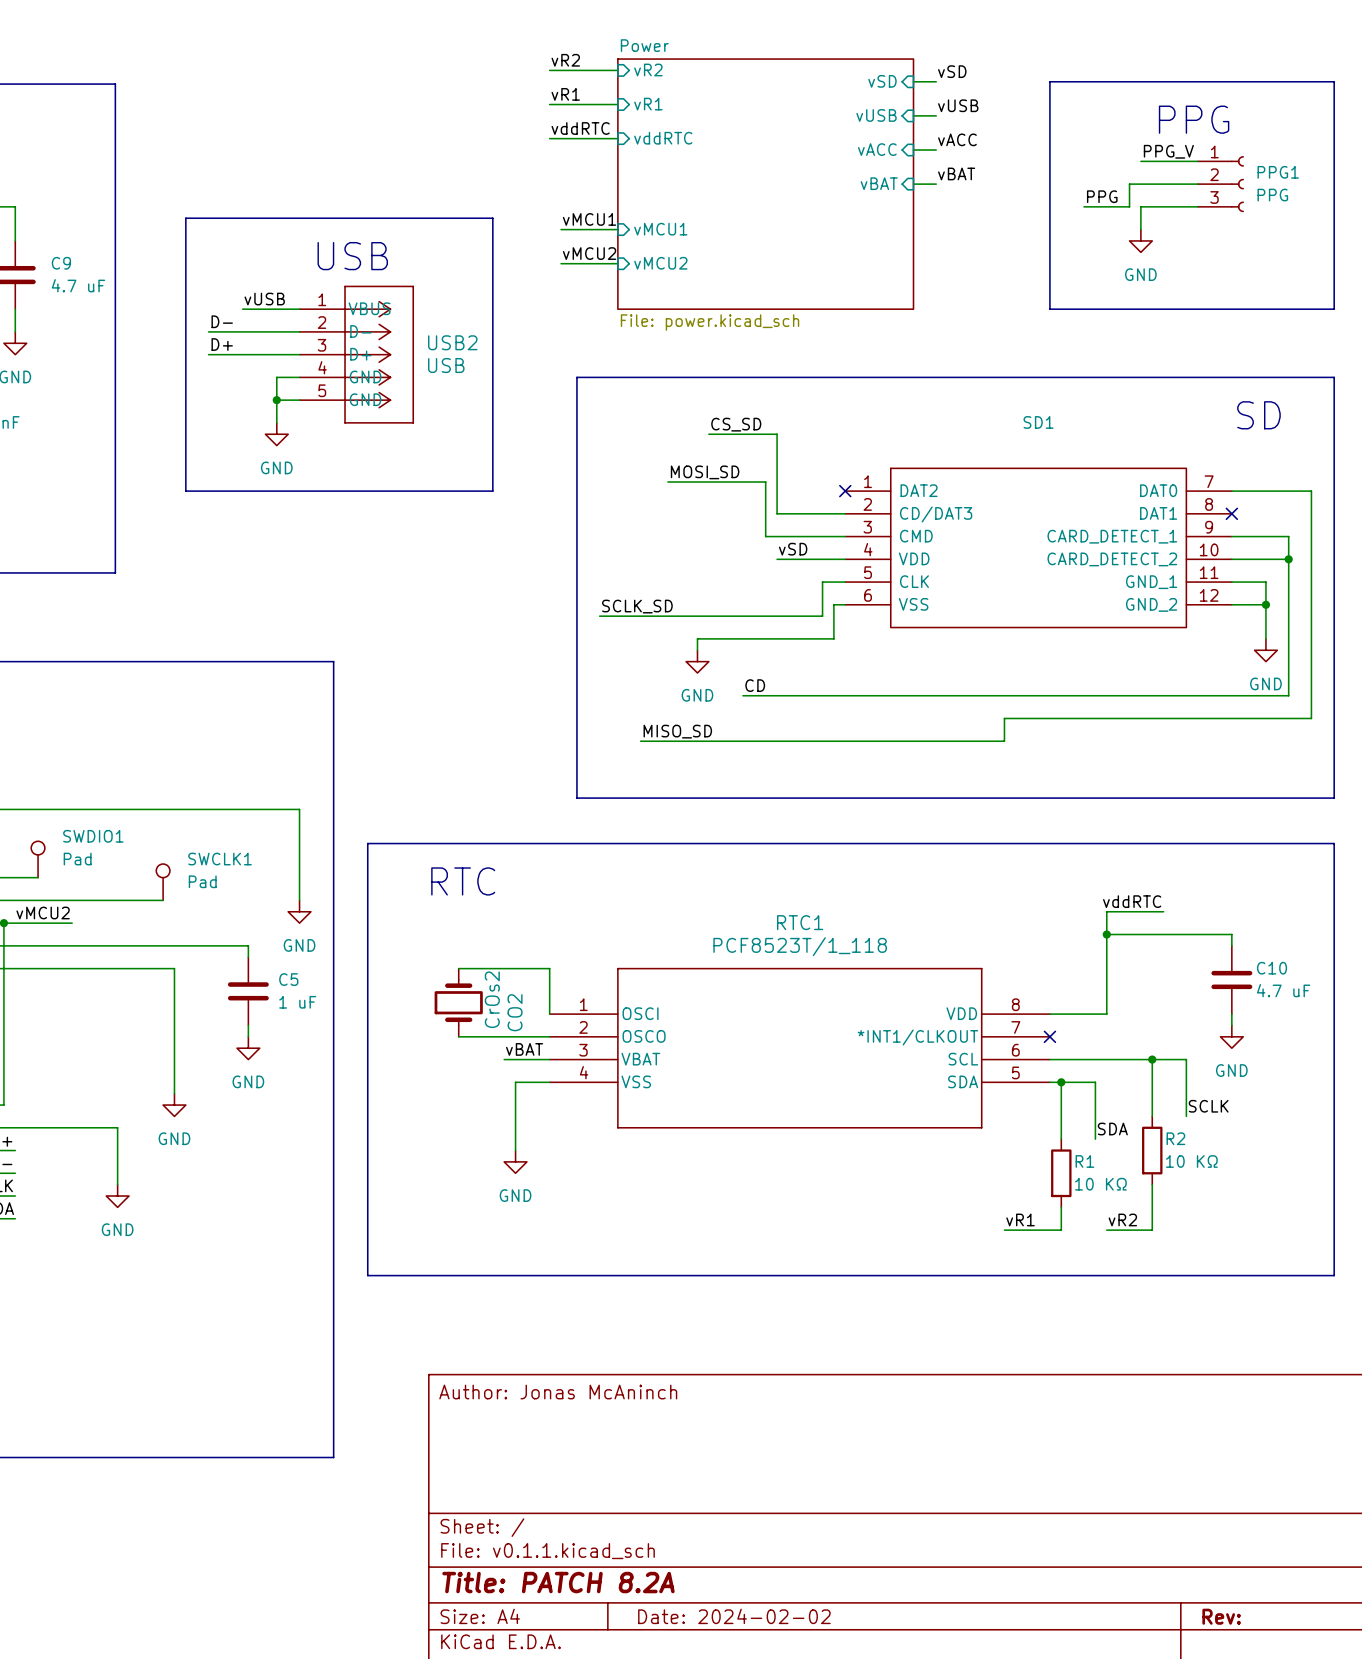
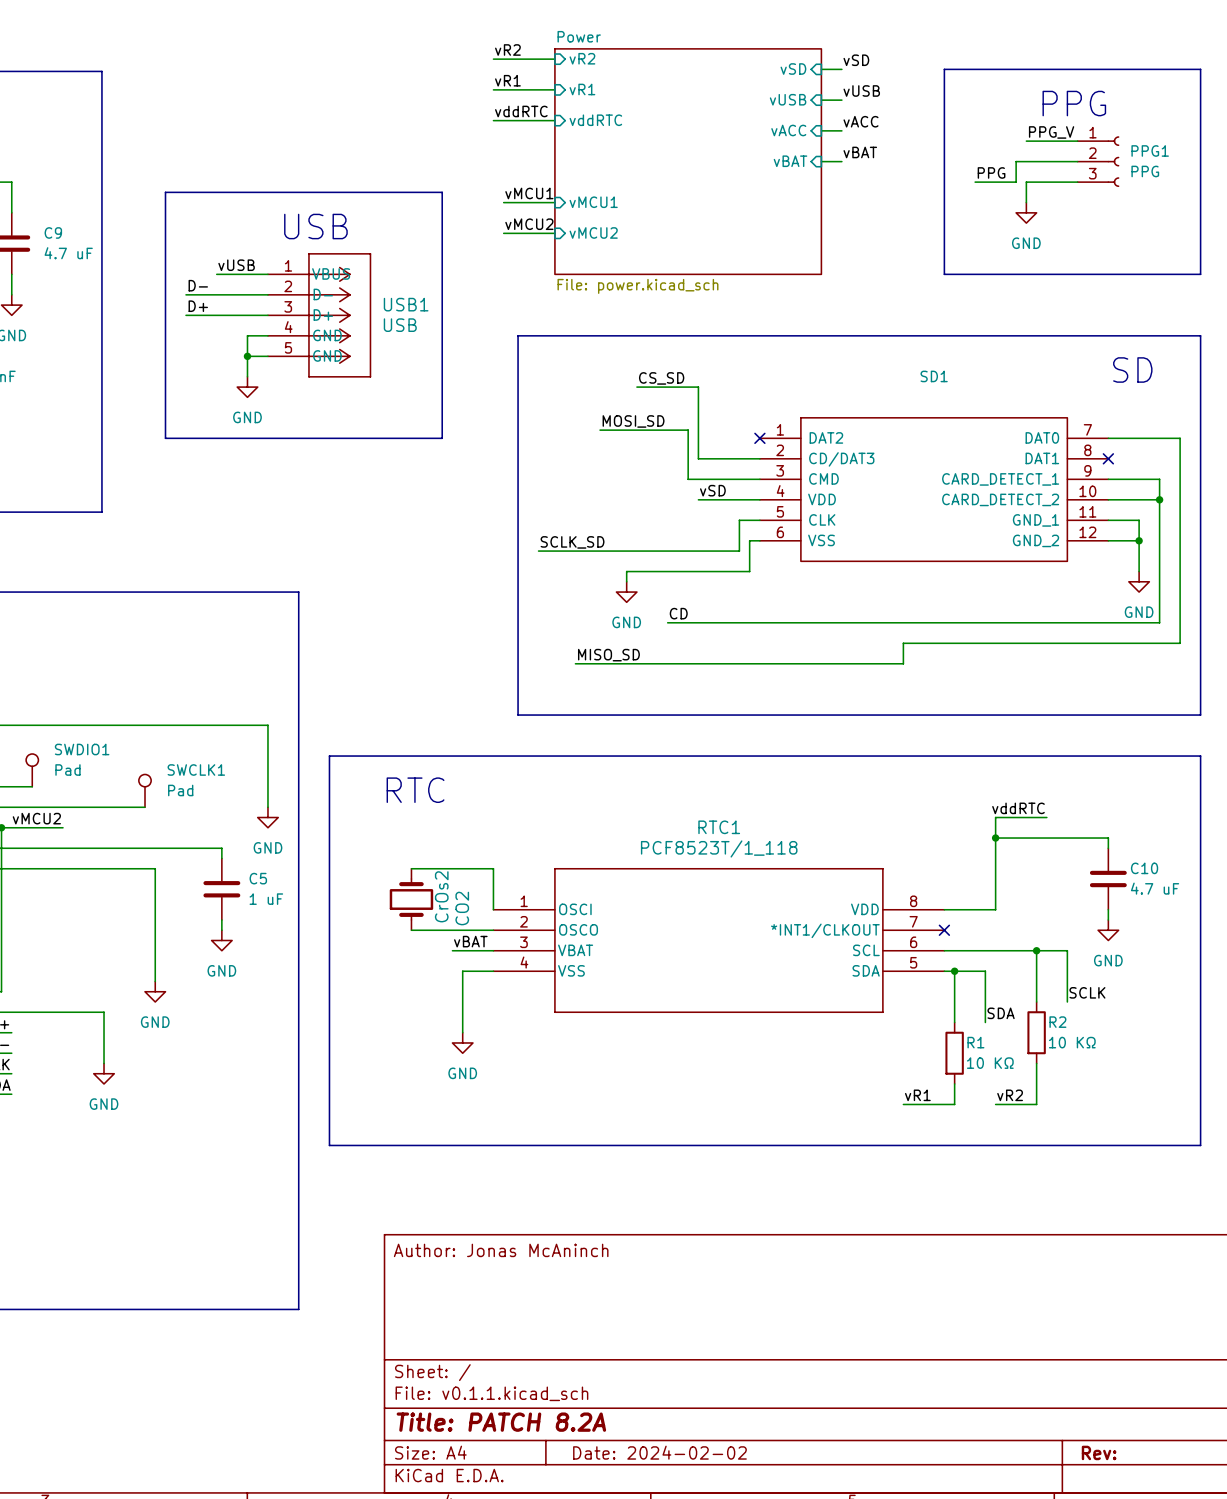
USB2 name: USB2 (452, 342) -> USB1 (406, 304)

